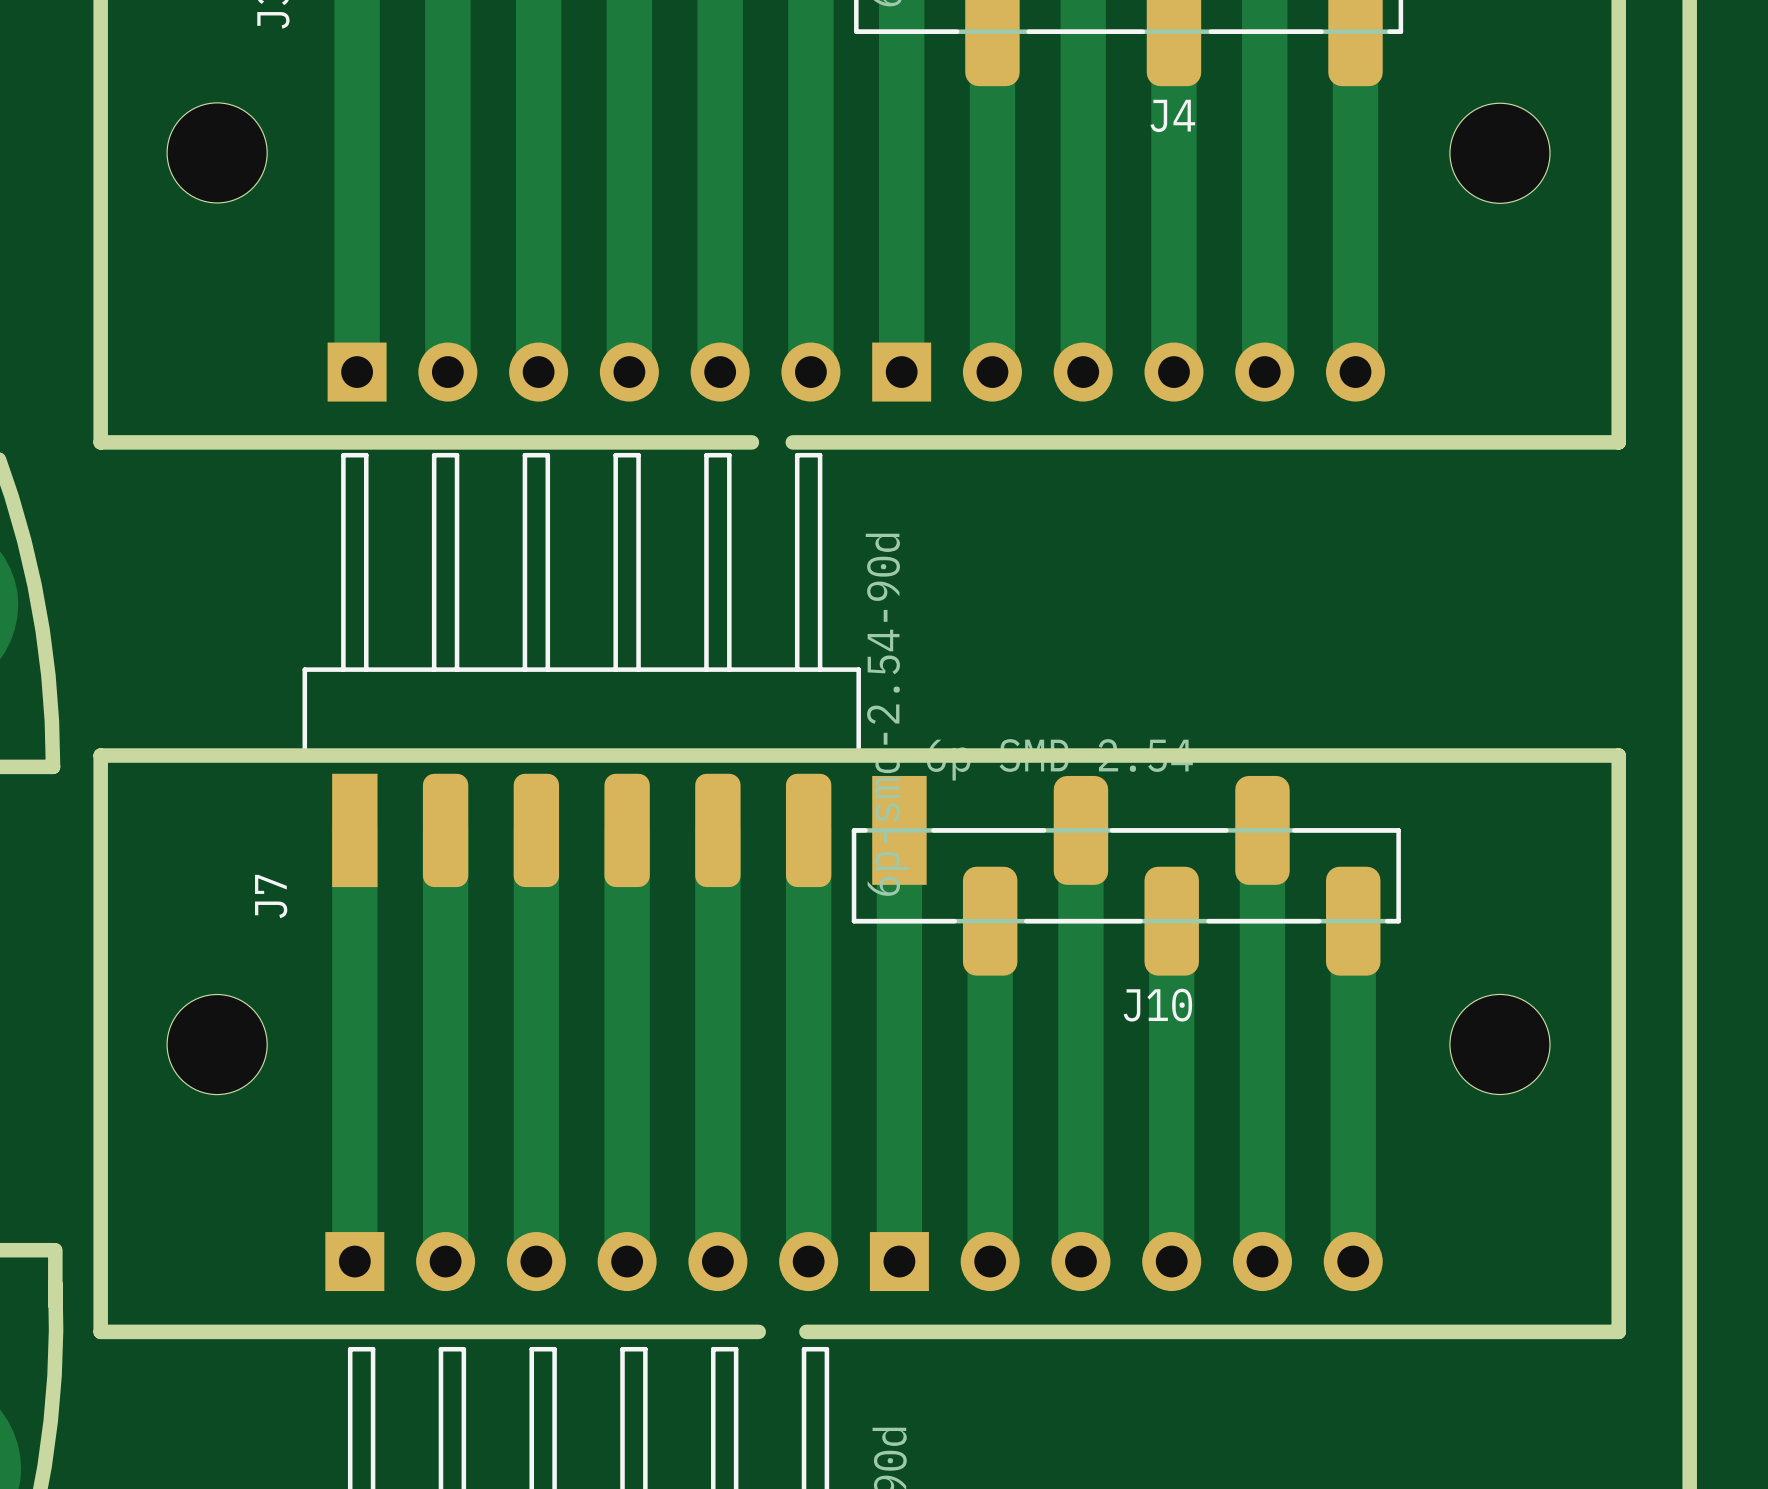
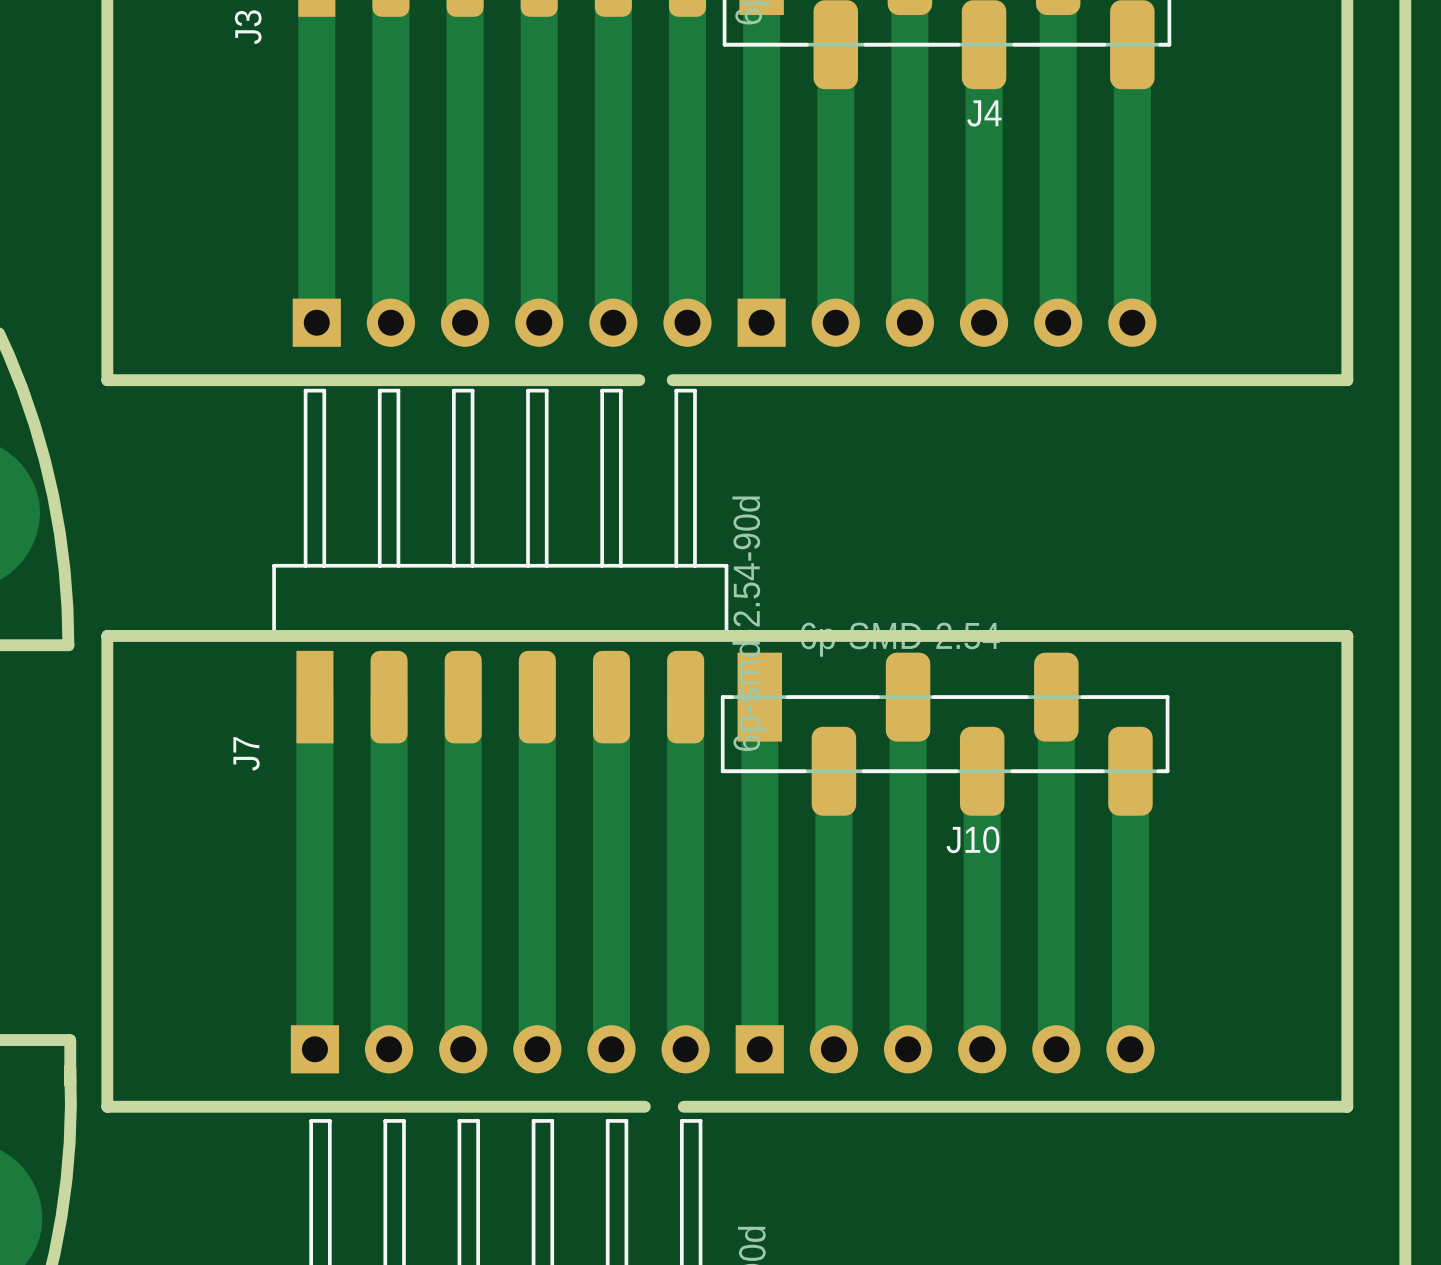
hole: (217, 152) -> none
hole: (1499, 153) -> none
hole: (217, 1044) -> none
hole: (1499, 1044) -> none

